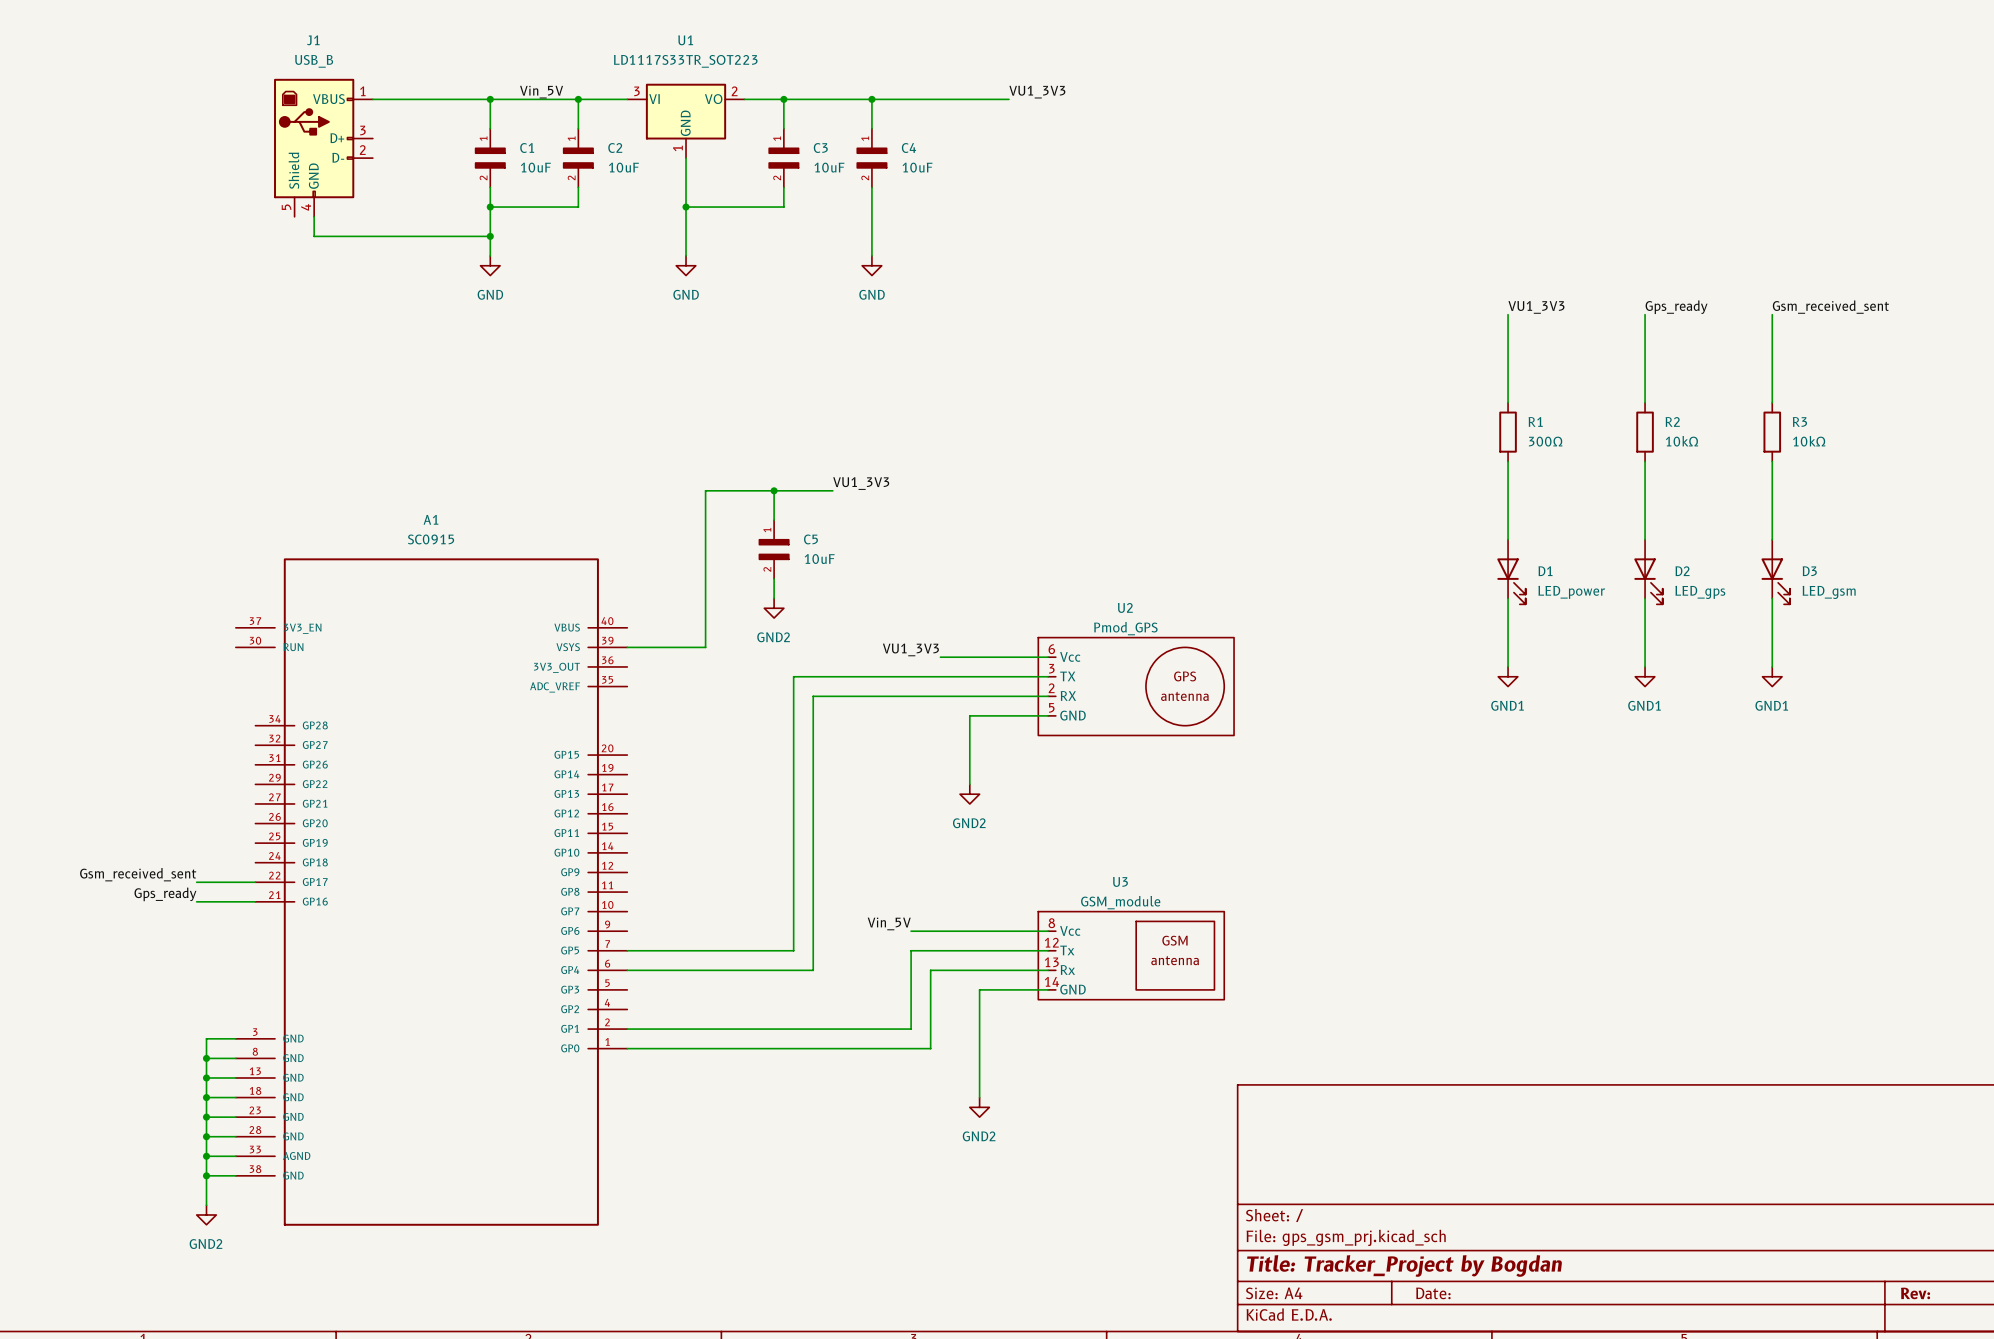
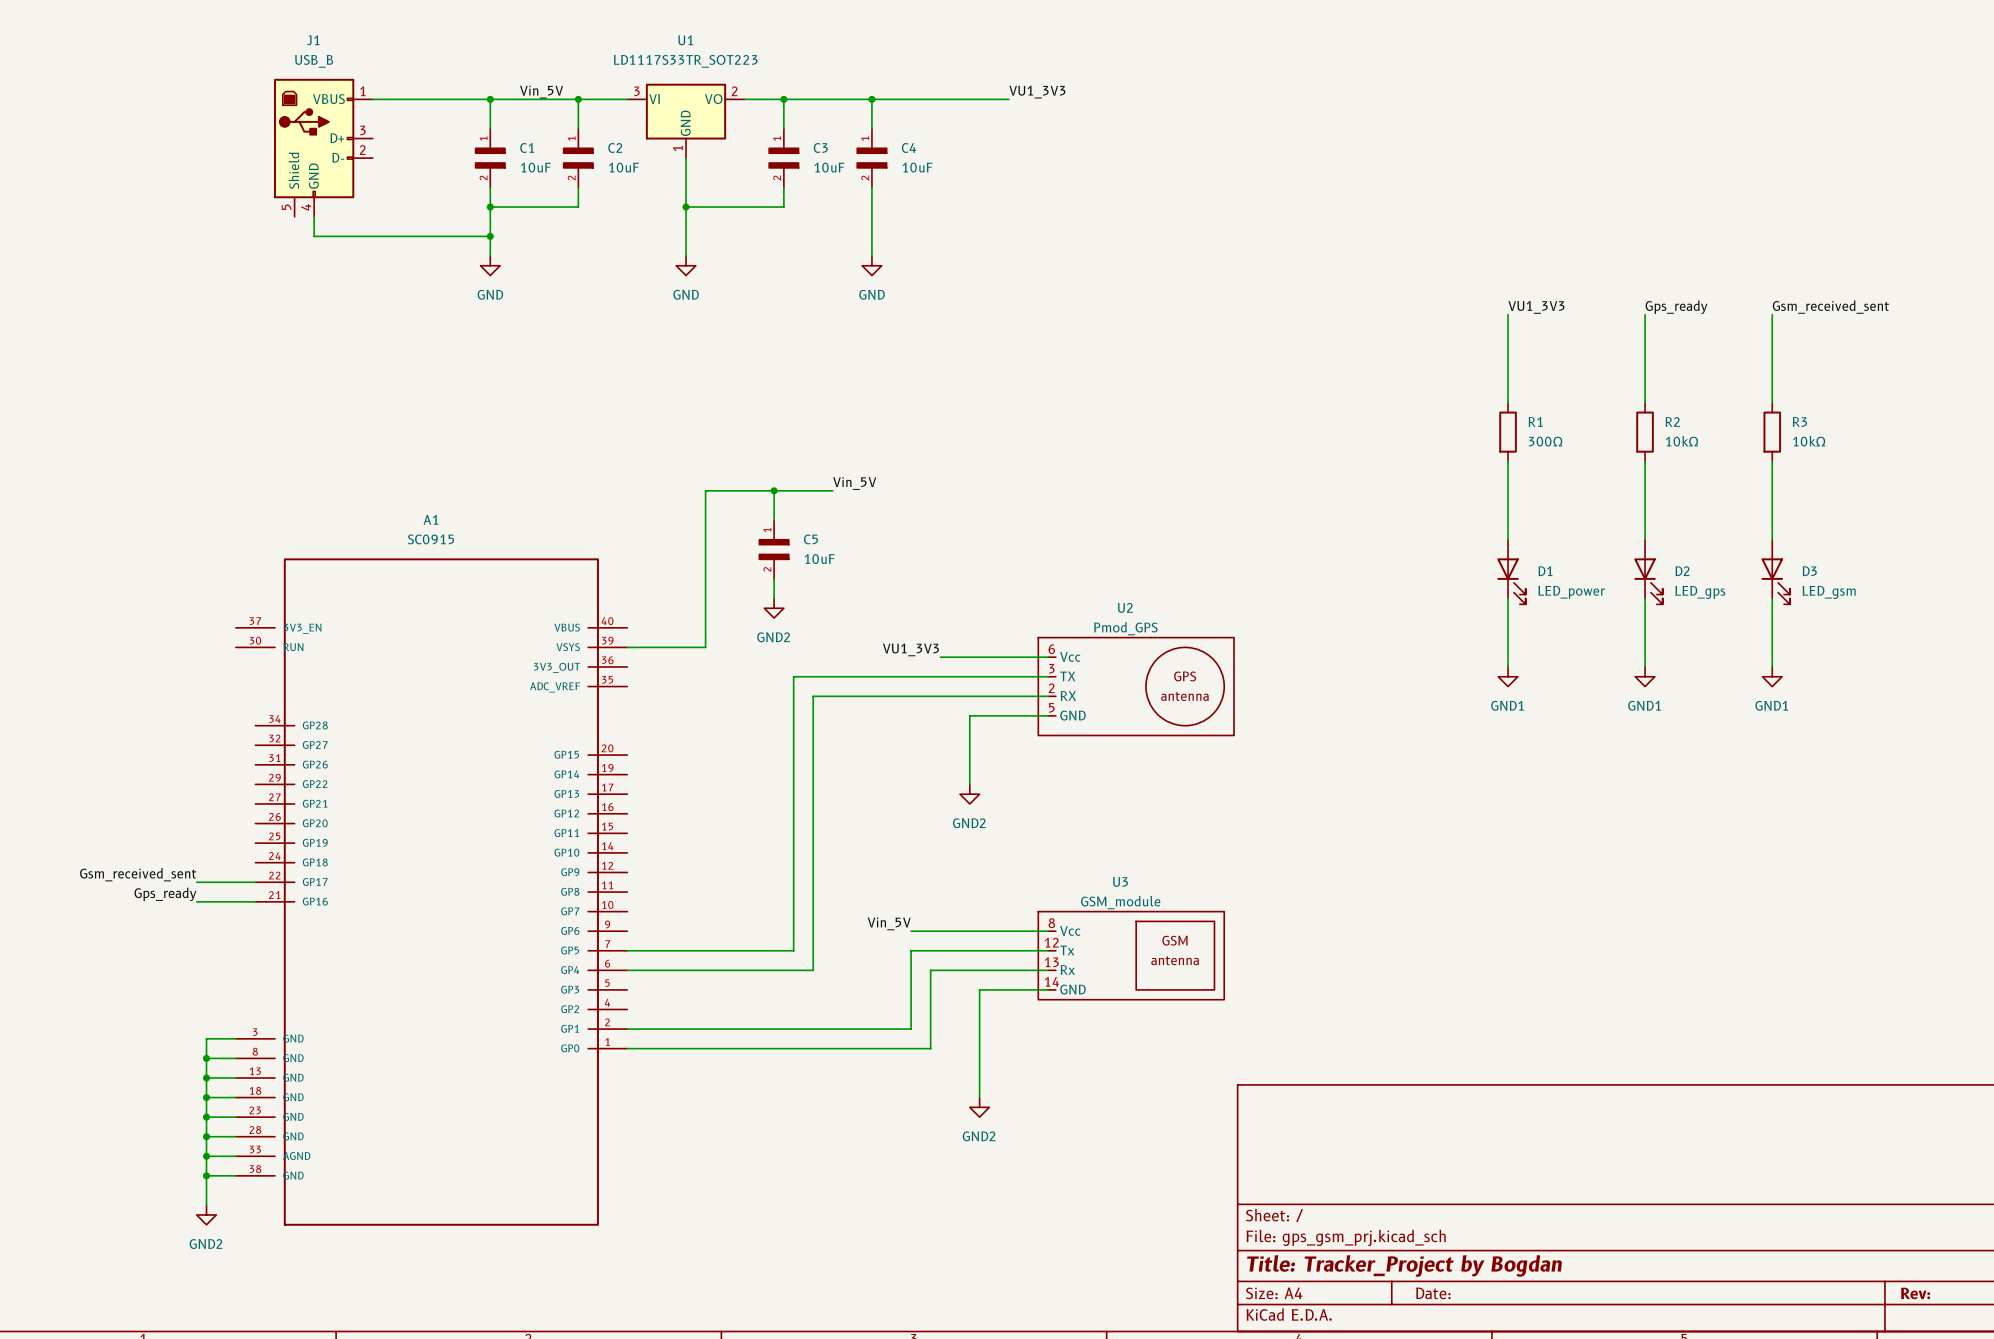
label: VU1_3V3 (861, 483) -> Vin_5V (854, 483)

